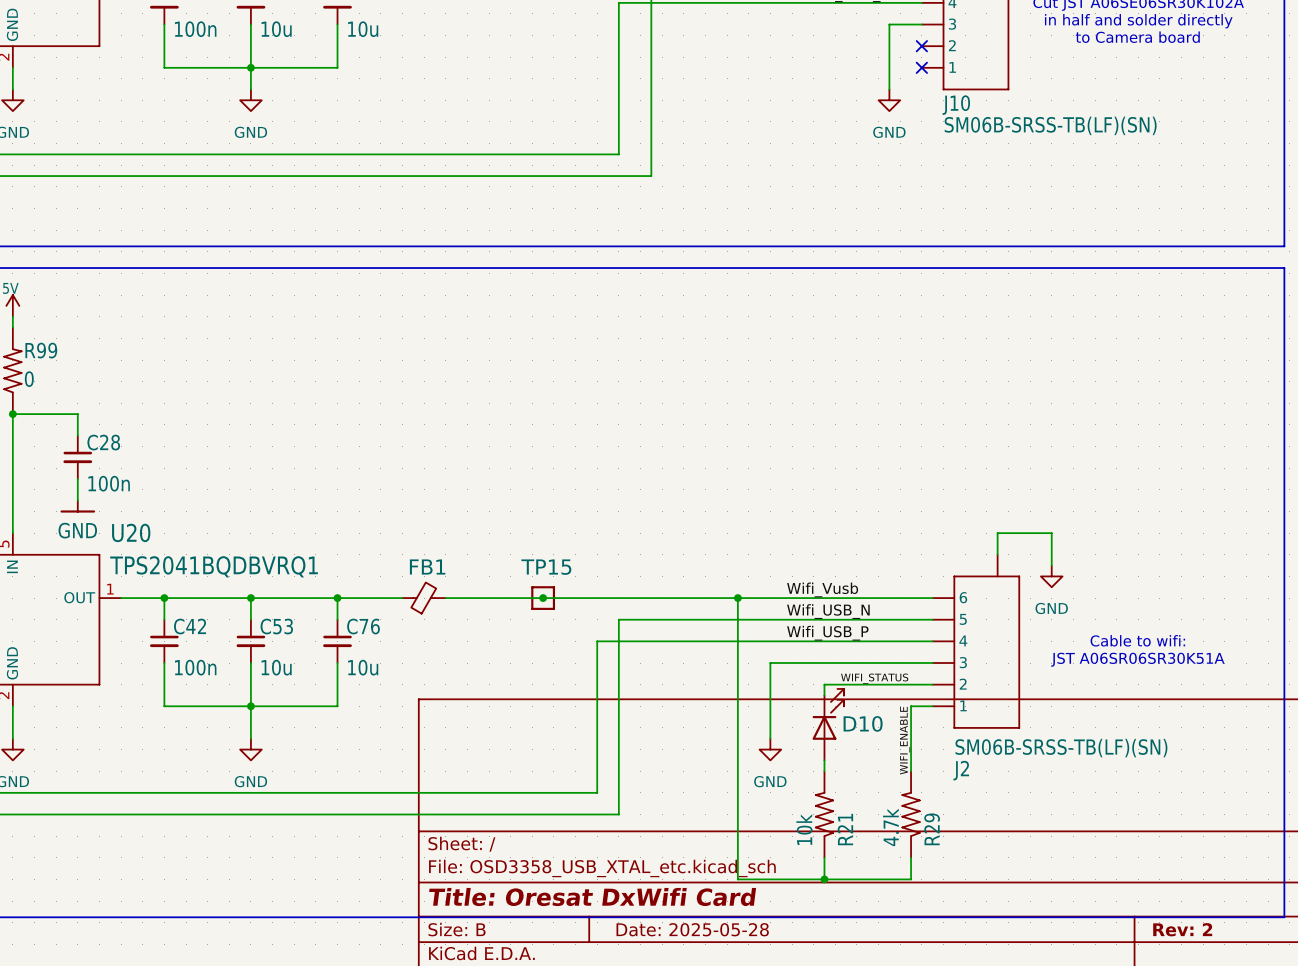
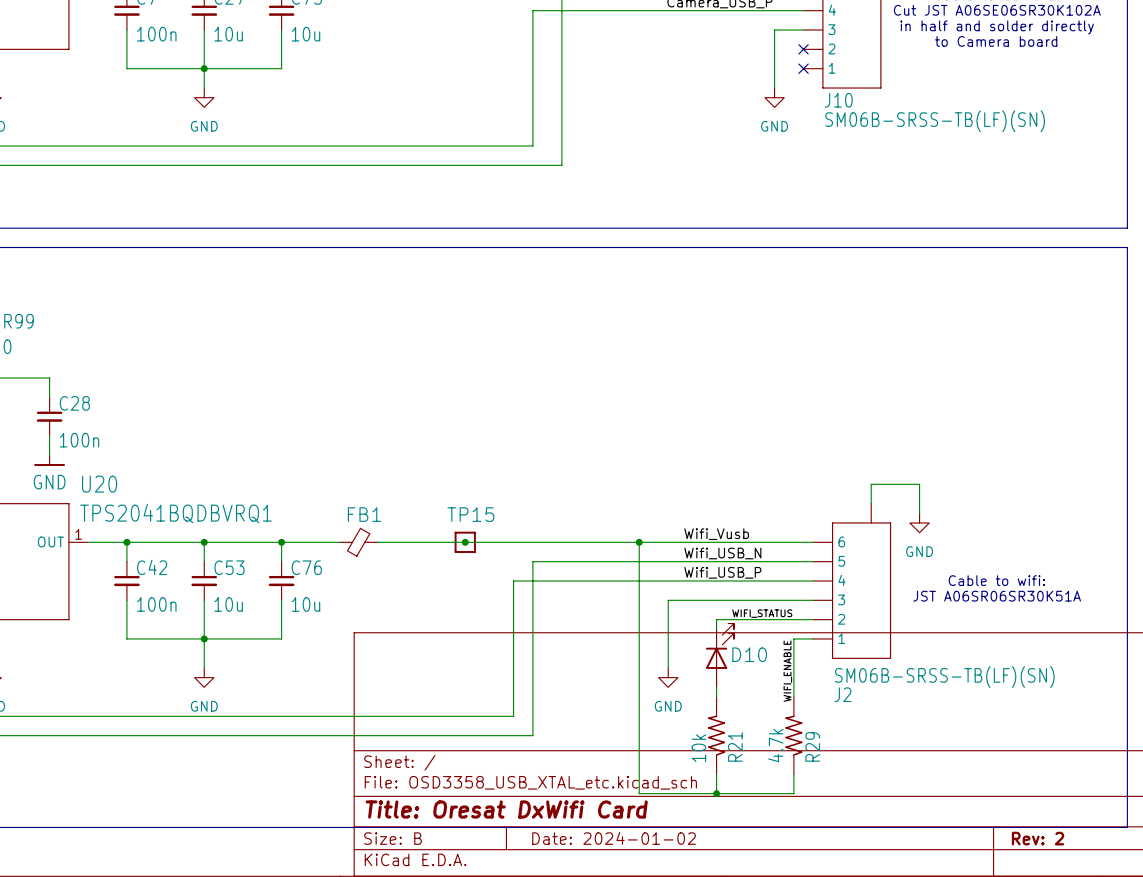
title block: Date: 2025-05-28 (692, 929) -> Date: 2024-01-02 (614, 838)

